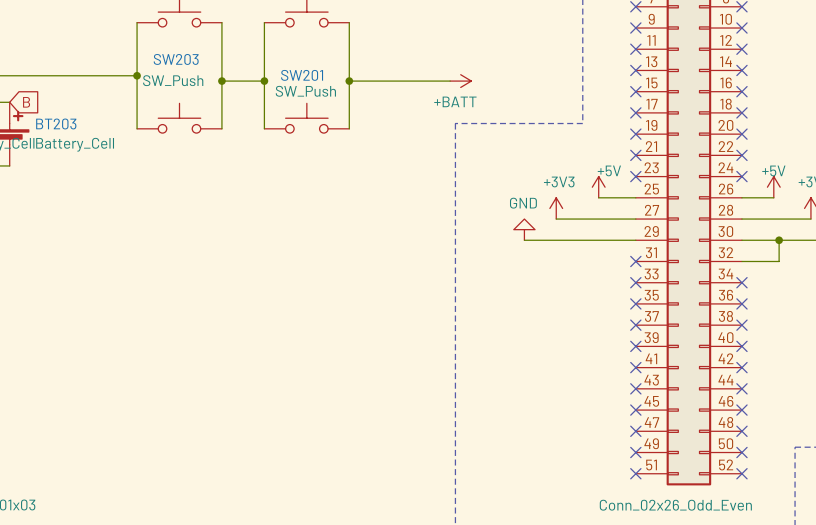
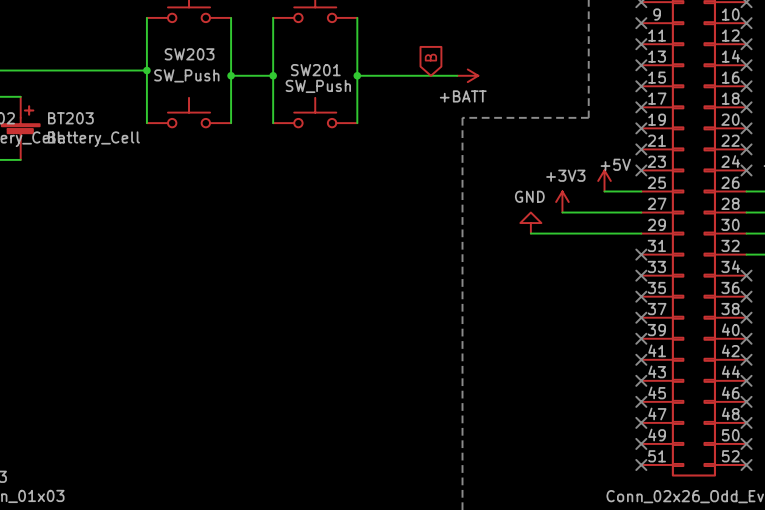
global label: none -> B (430, 57)
global label: B (26, 102) -> none

